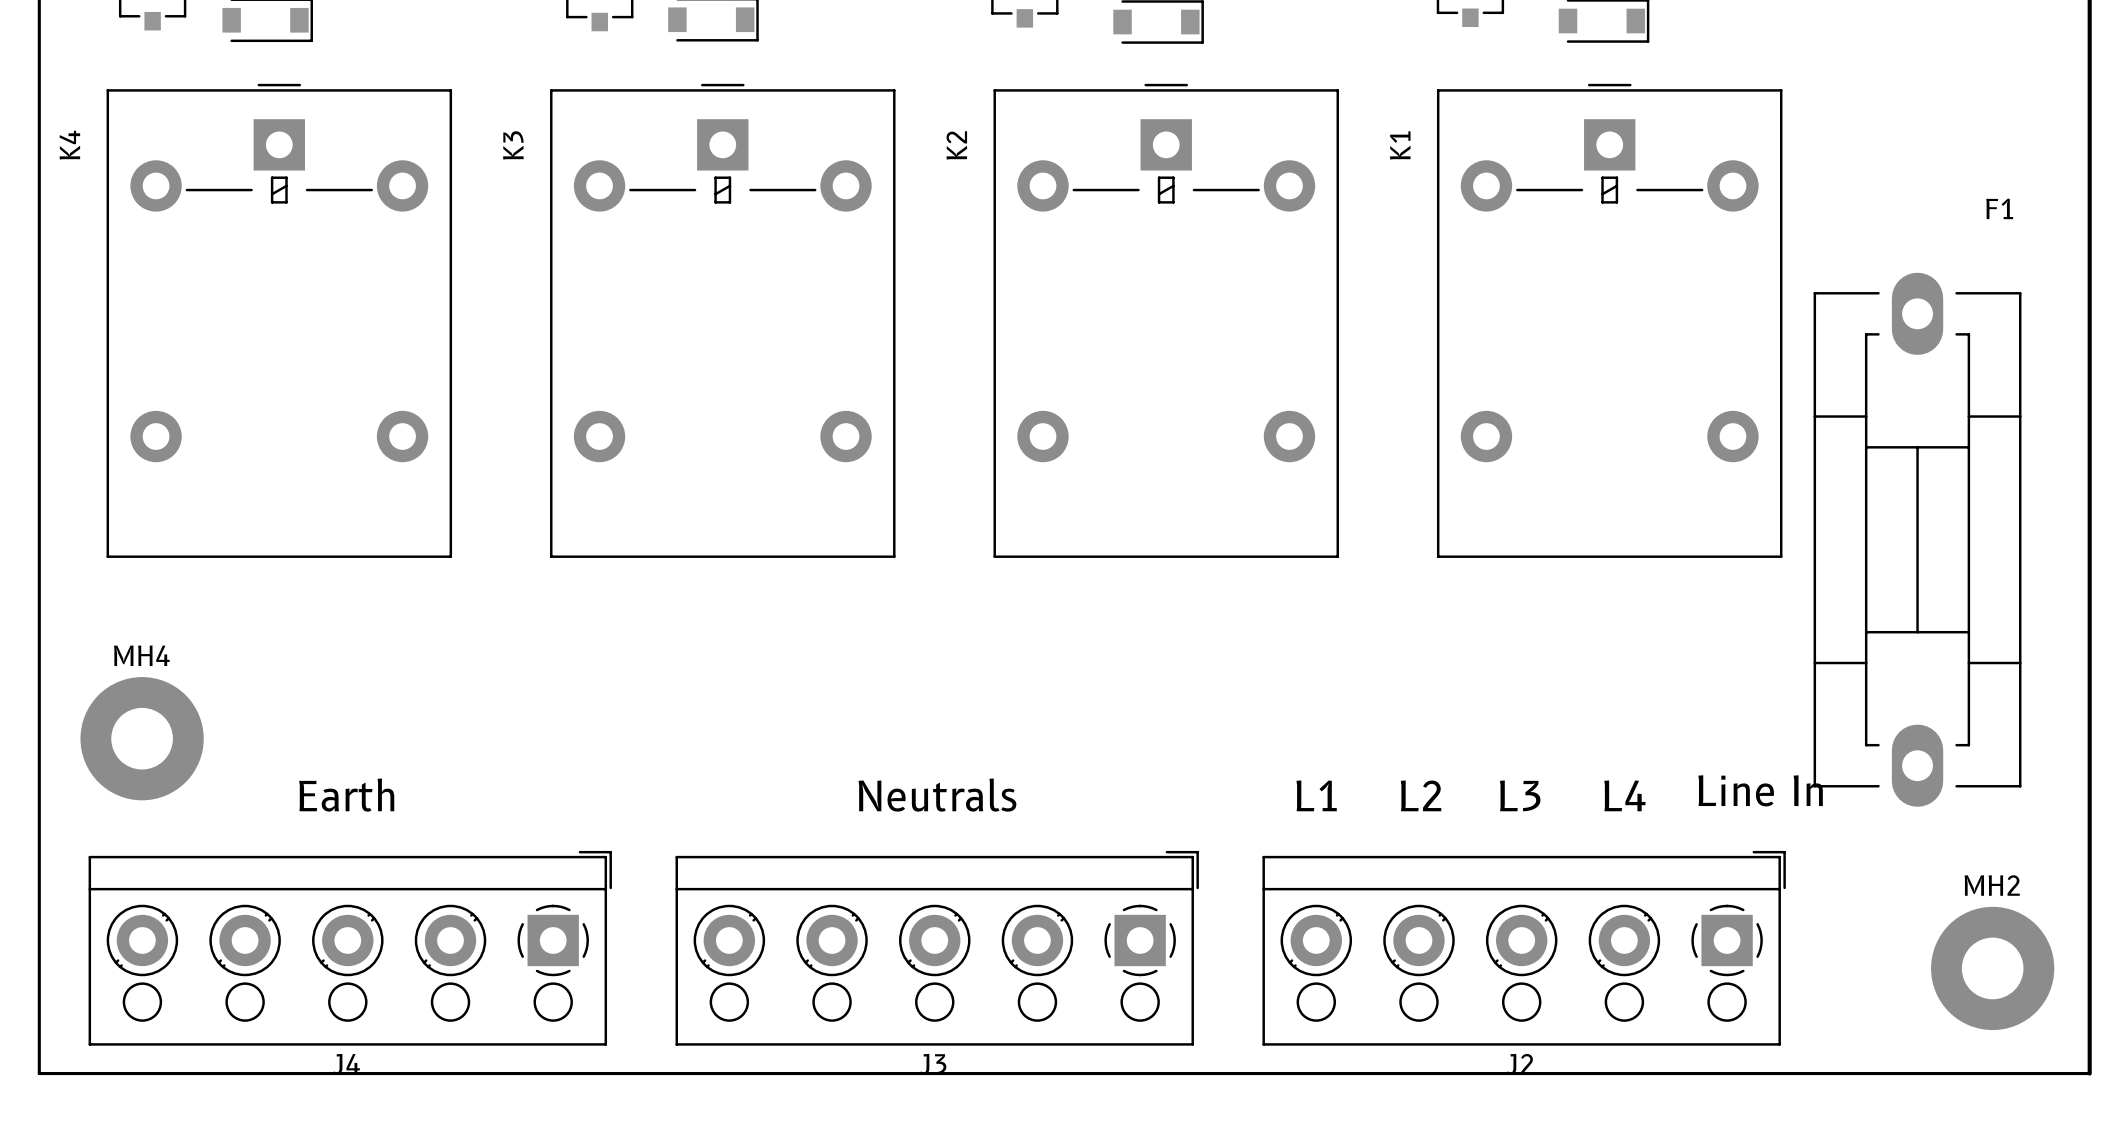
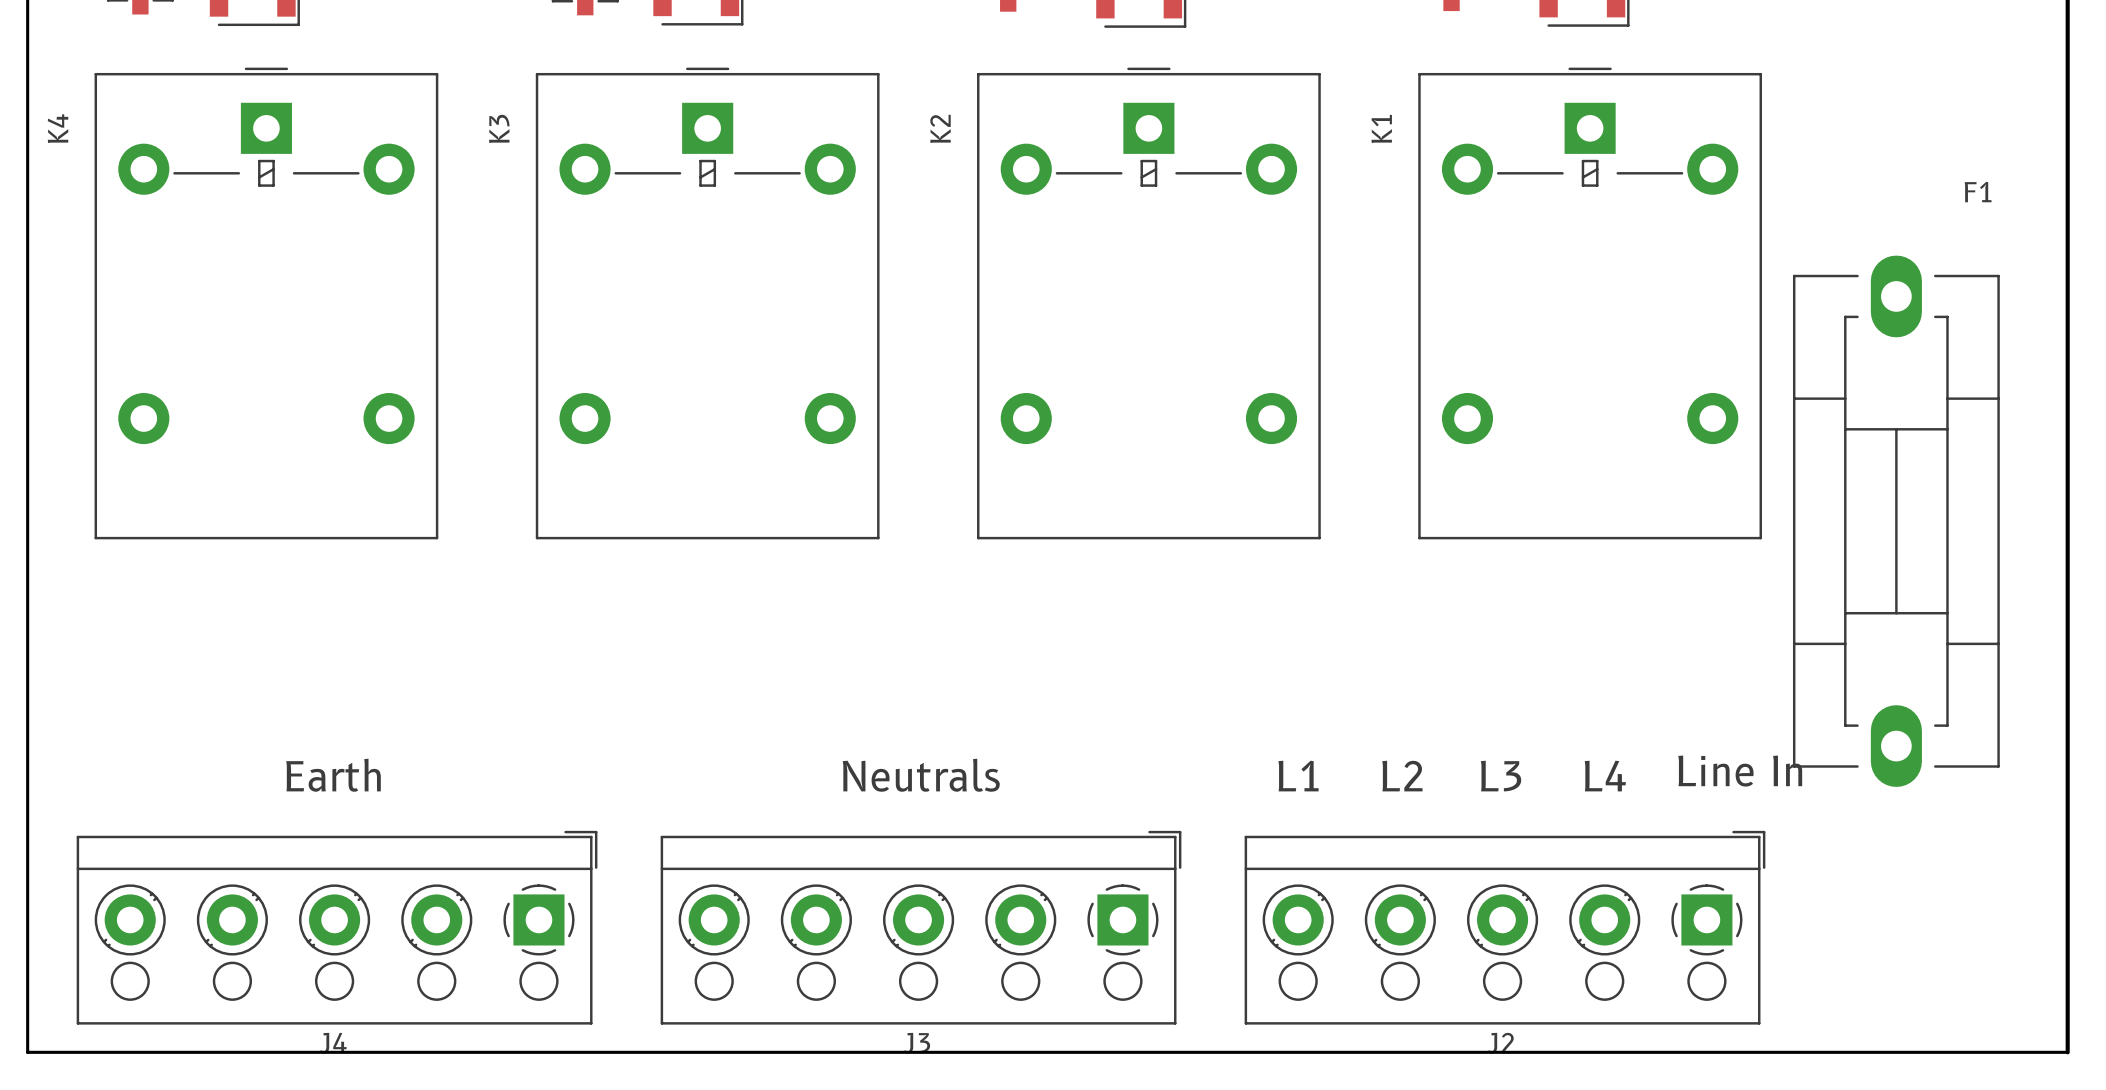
MH4: (142, 738) -> none
MH2: (1992, 968) -> none

